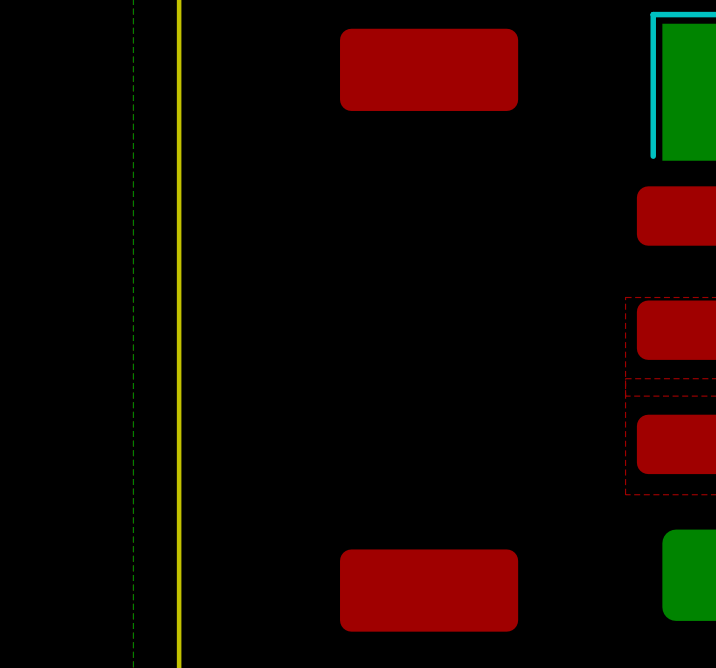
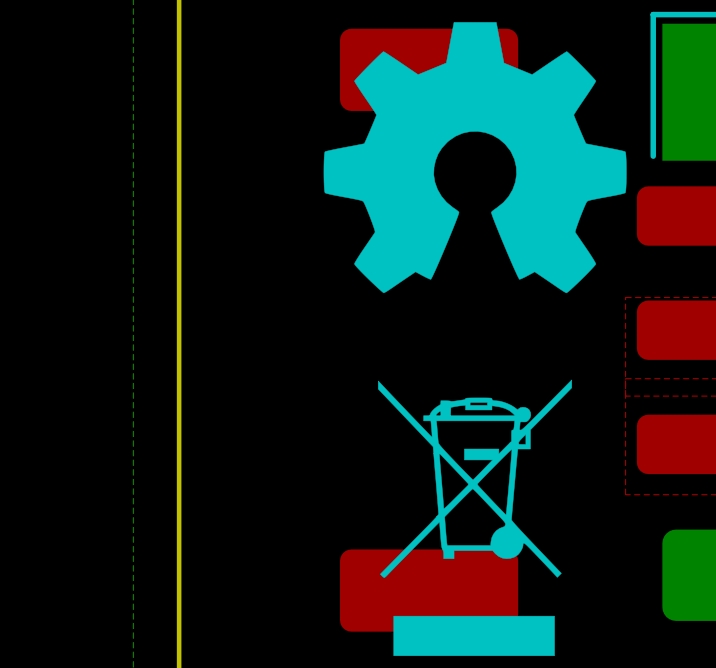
drawing: none -> [323, 22, 627, 294]
drawing: none -> [378, 379, 573, 657]

